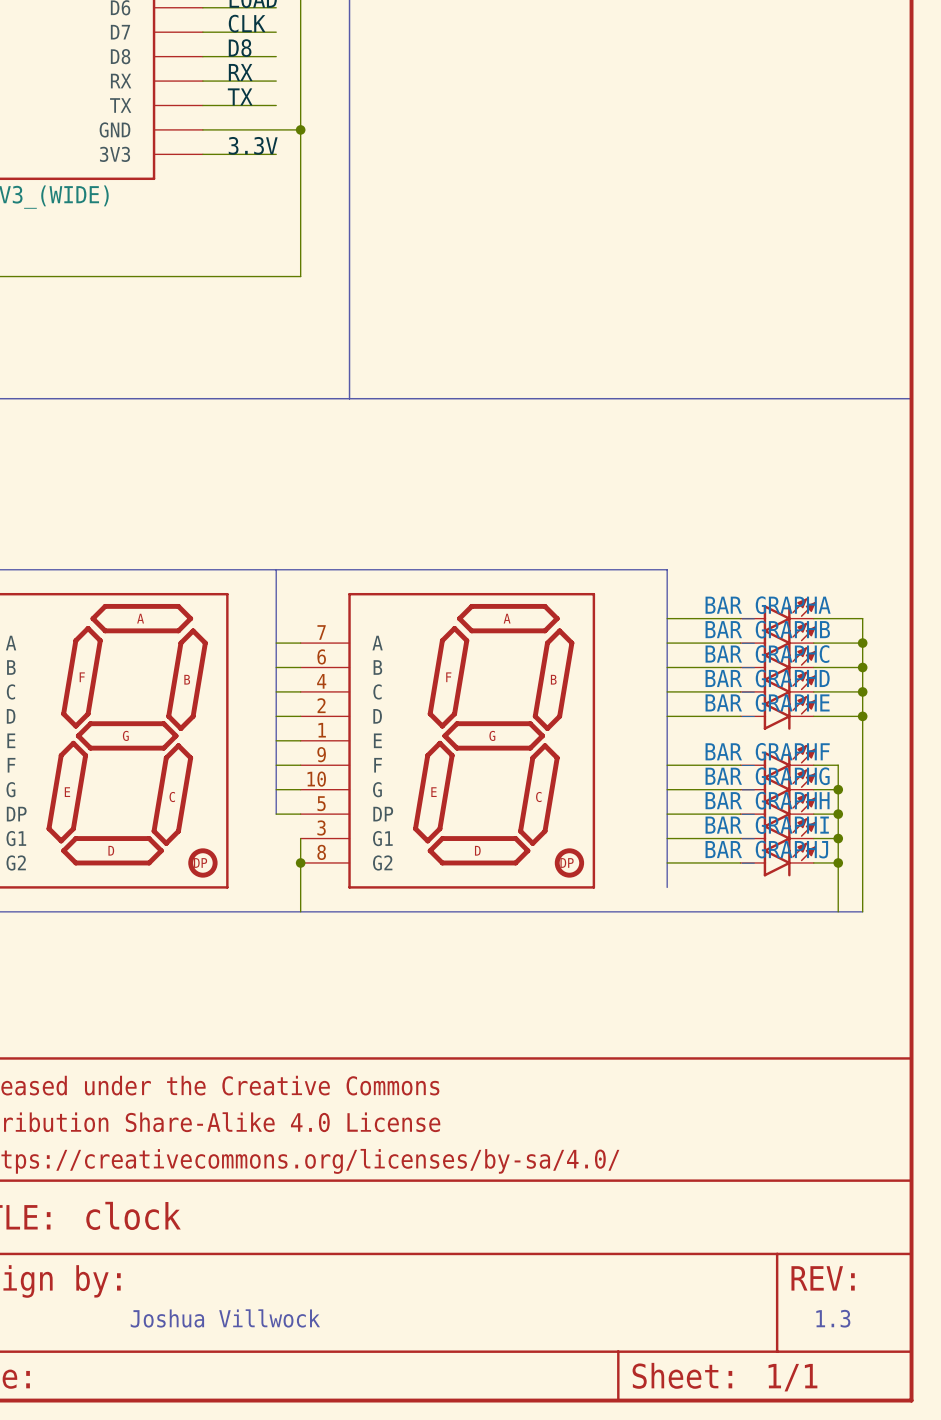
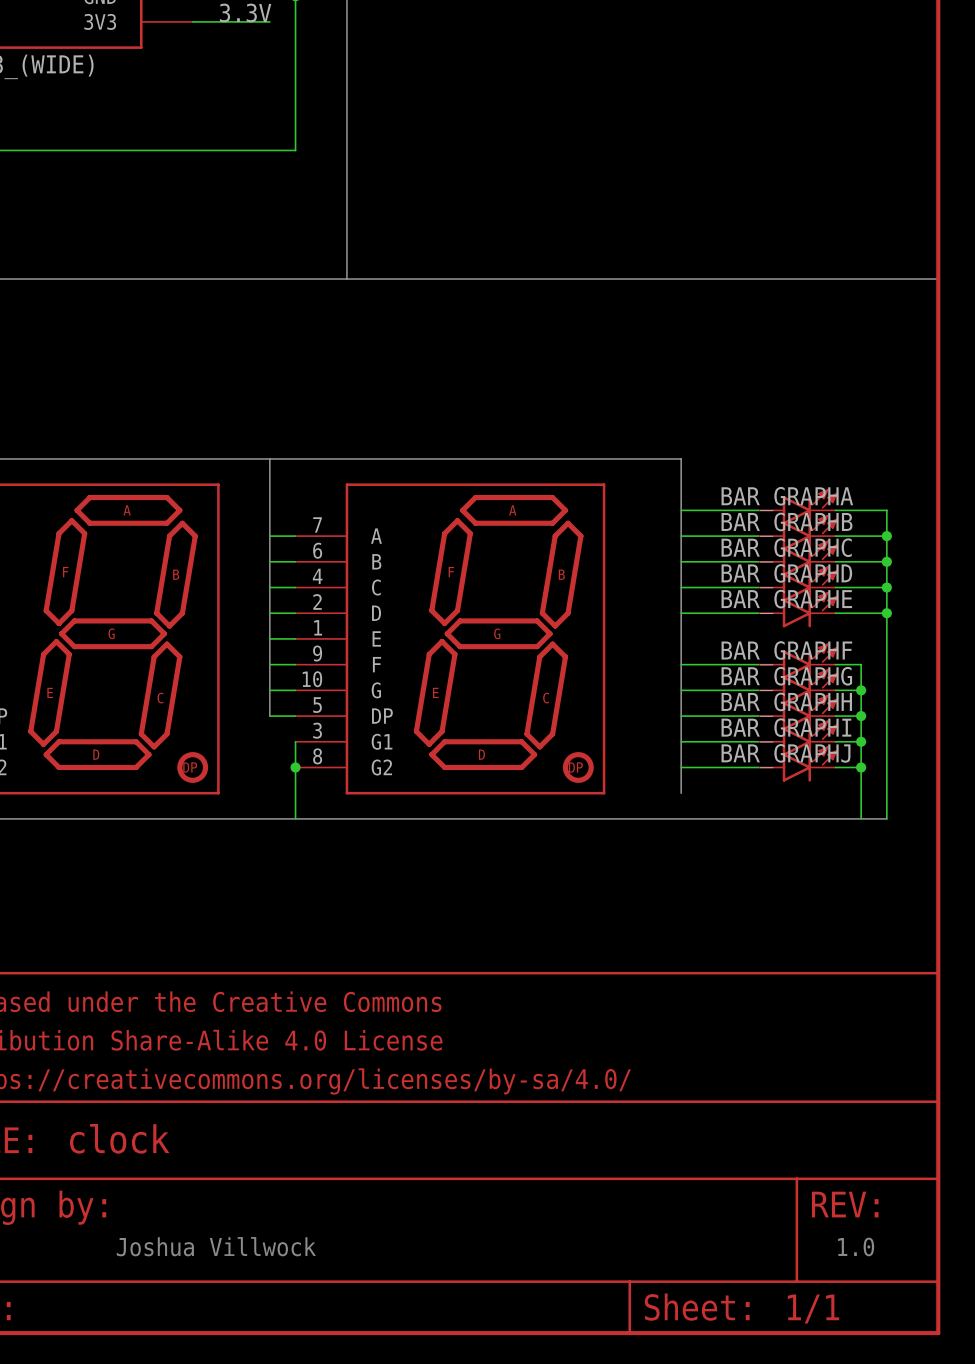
text: 1.3 (833, 1318) -> 1.0 (856, 1246)

